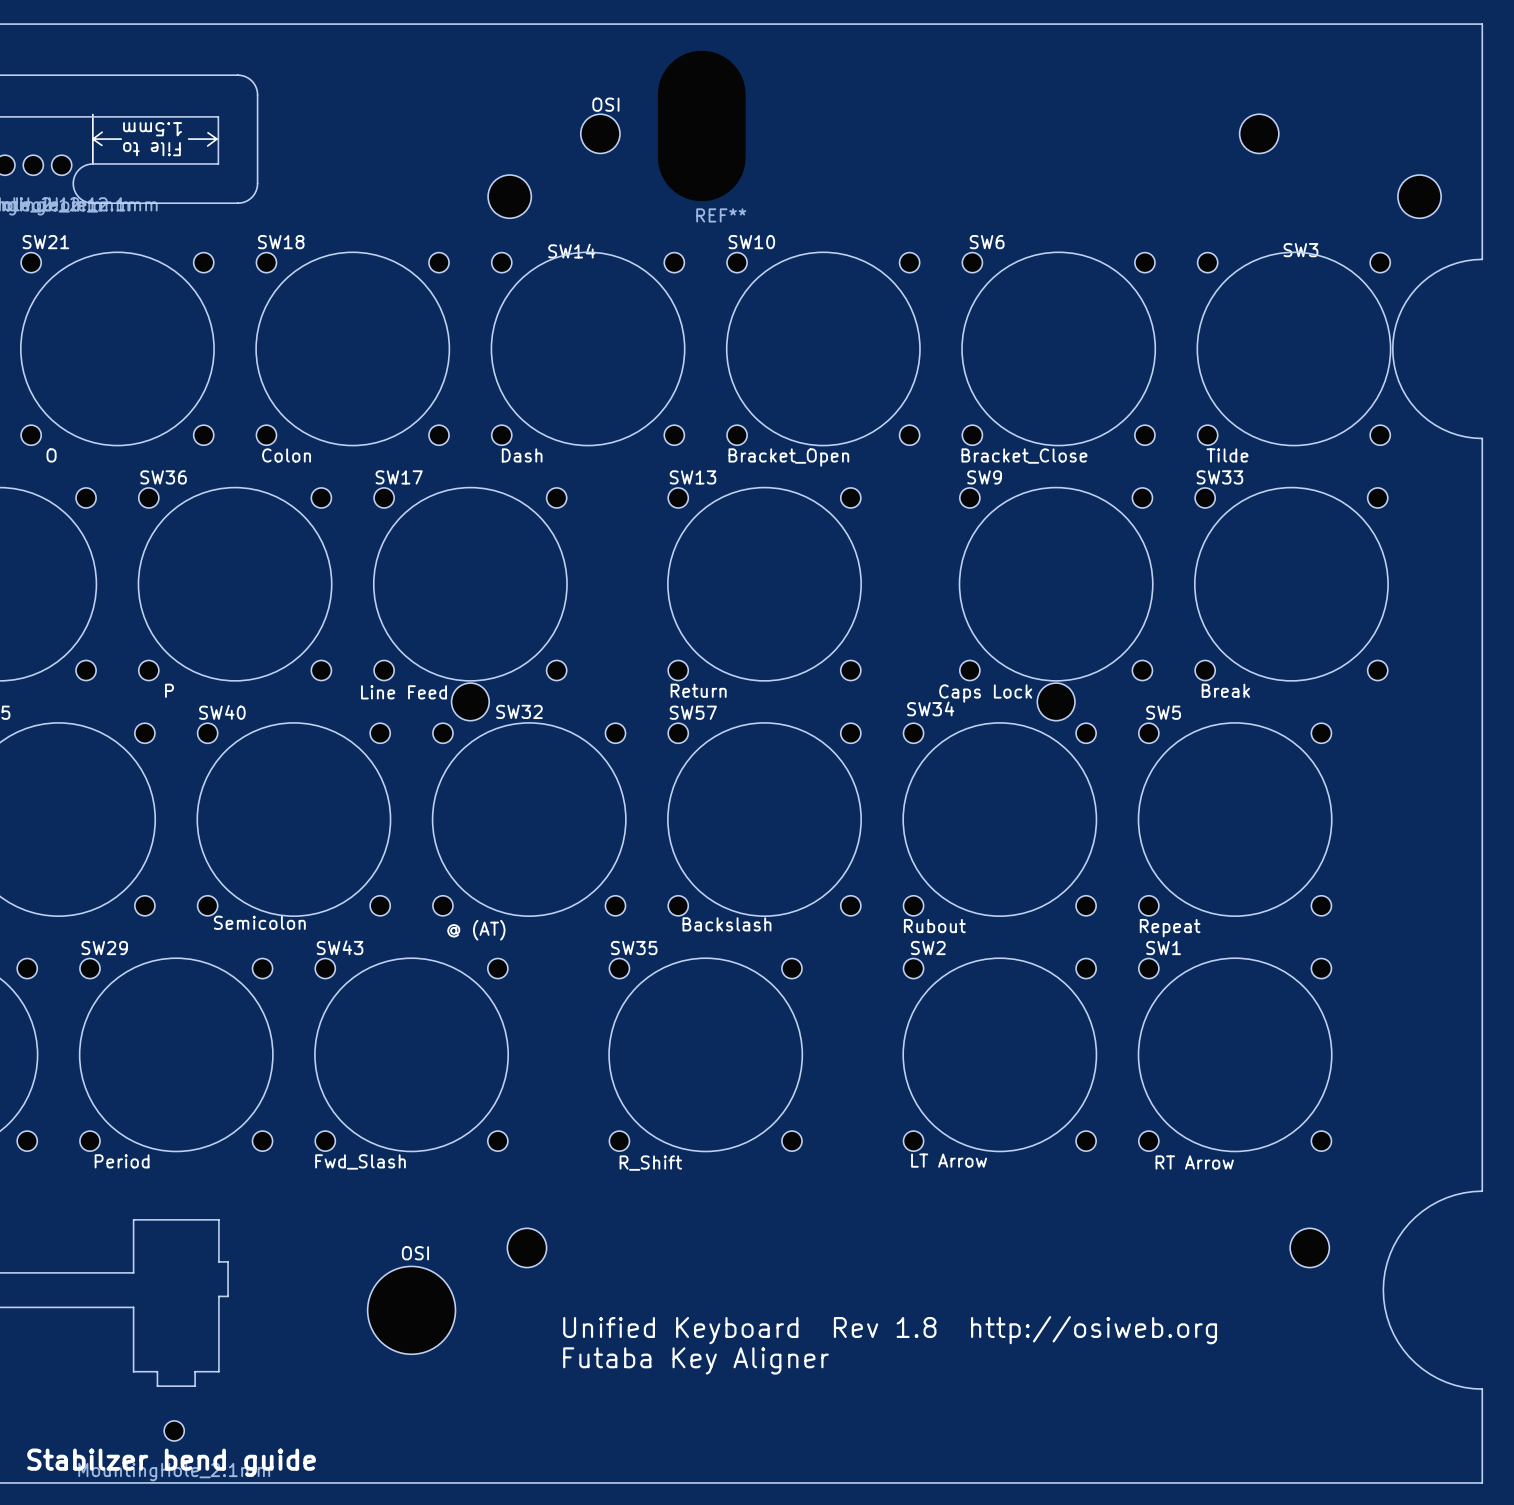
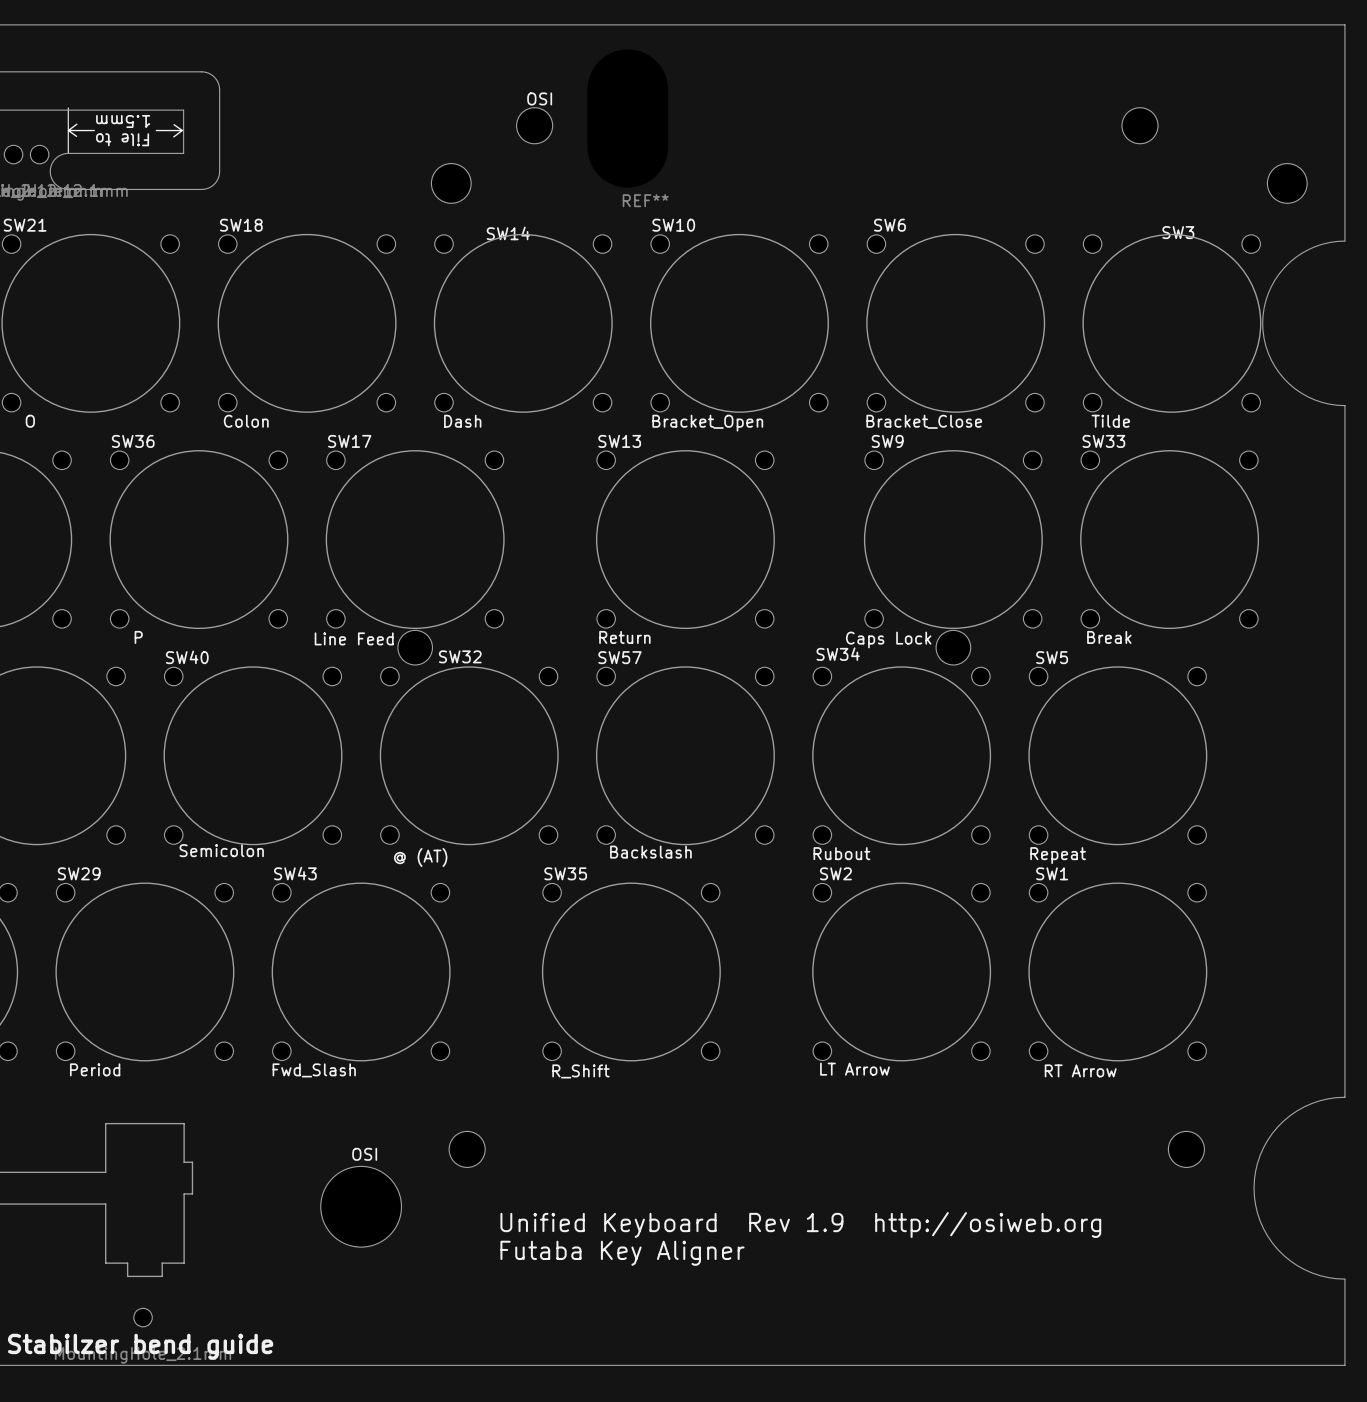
text: Unified Keyboard Rev 1.8 http://osiweb.org (890, 1330) -> Unified Keyboard Rev 1.9 http://osiweb.org (800, 1224)

